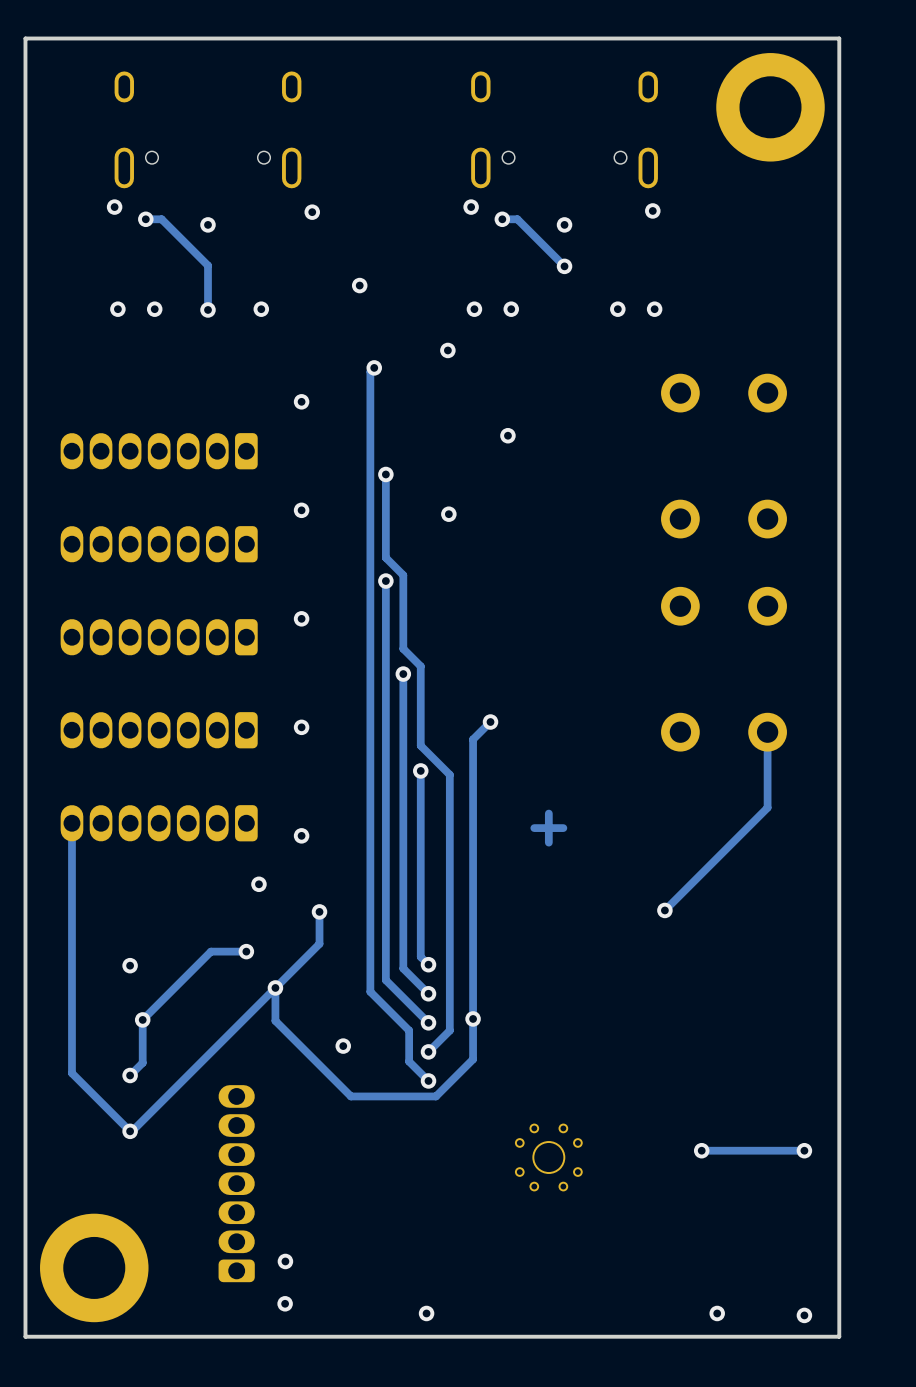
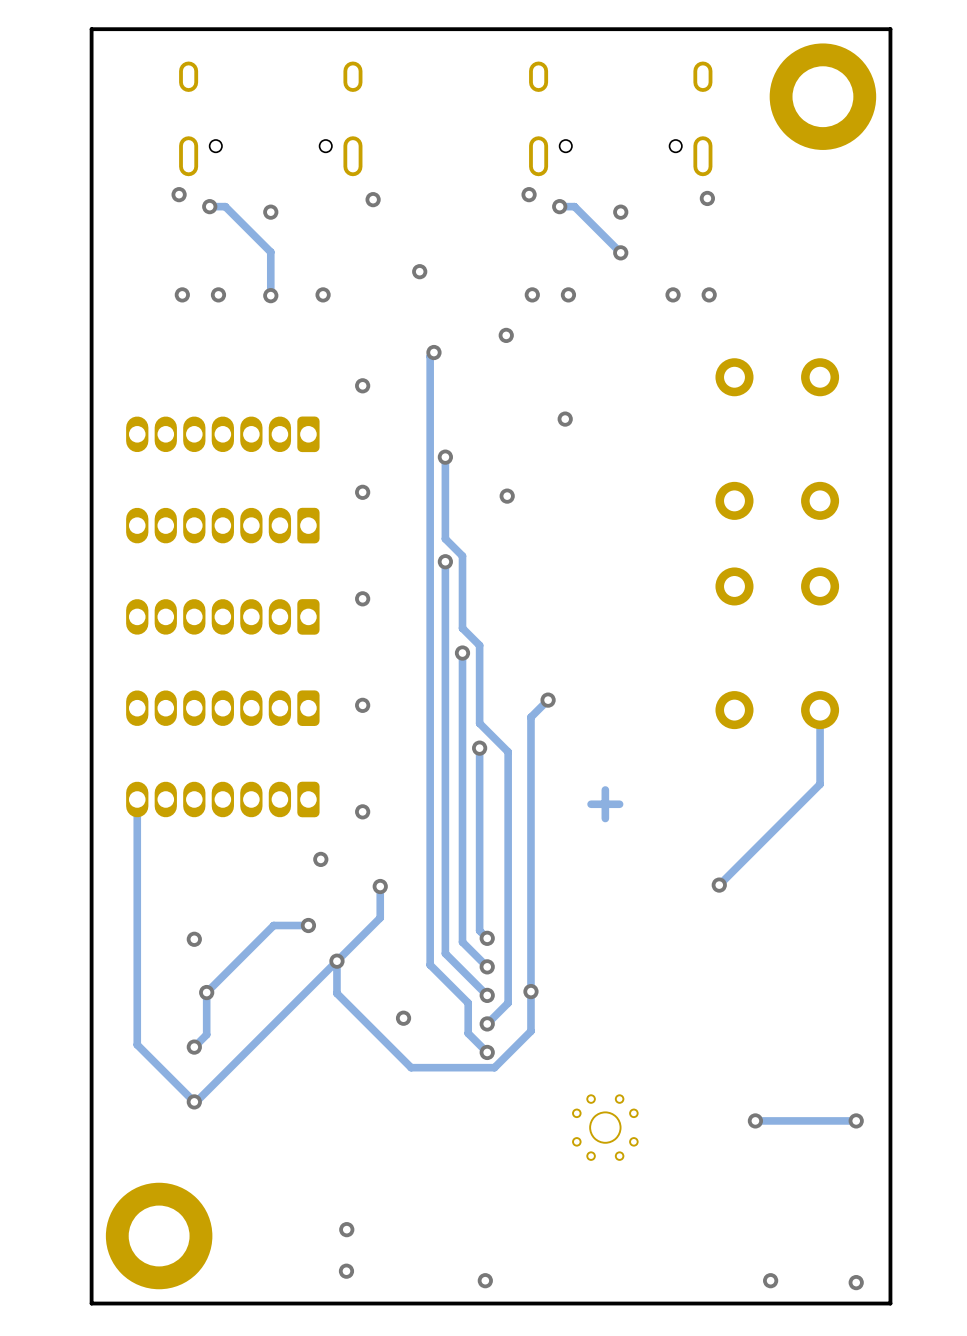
part: (236, 1183) -> none

